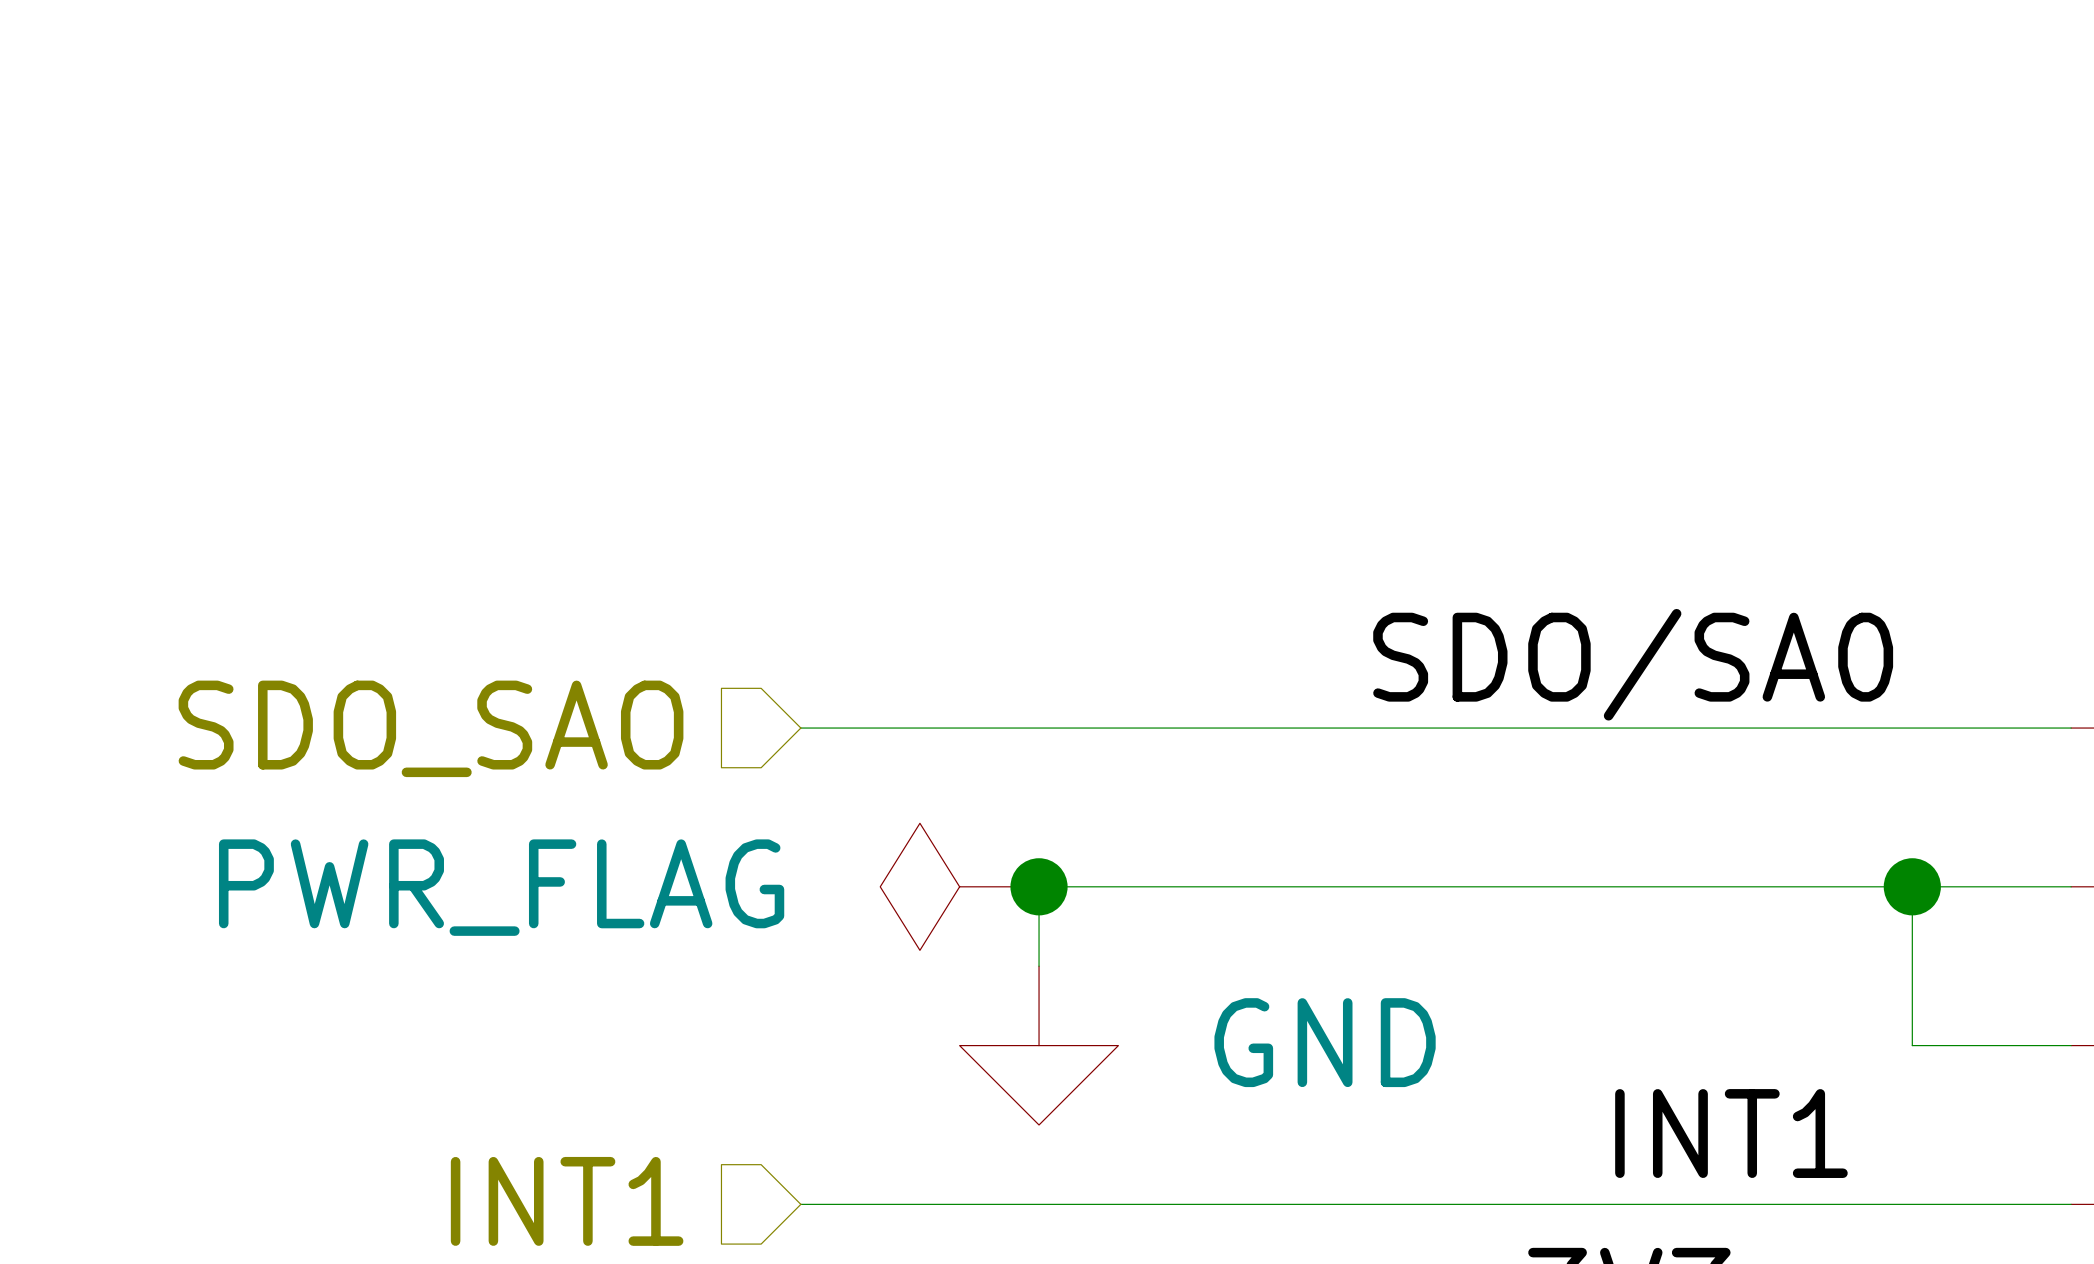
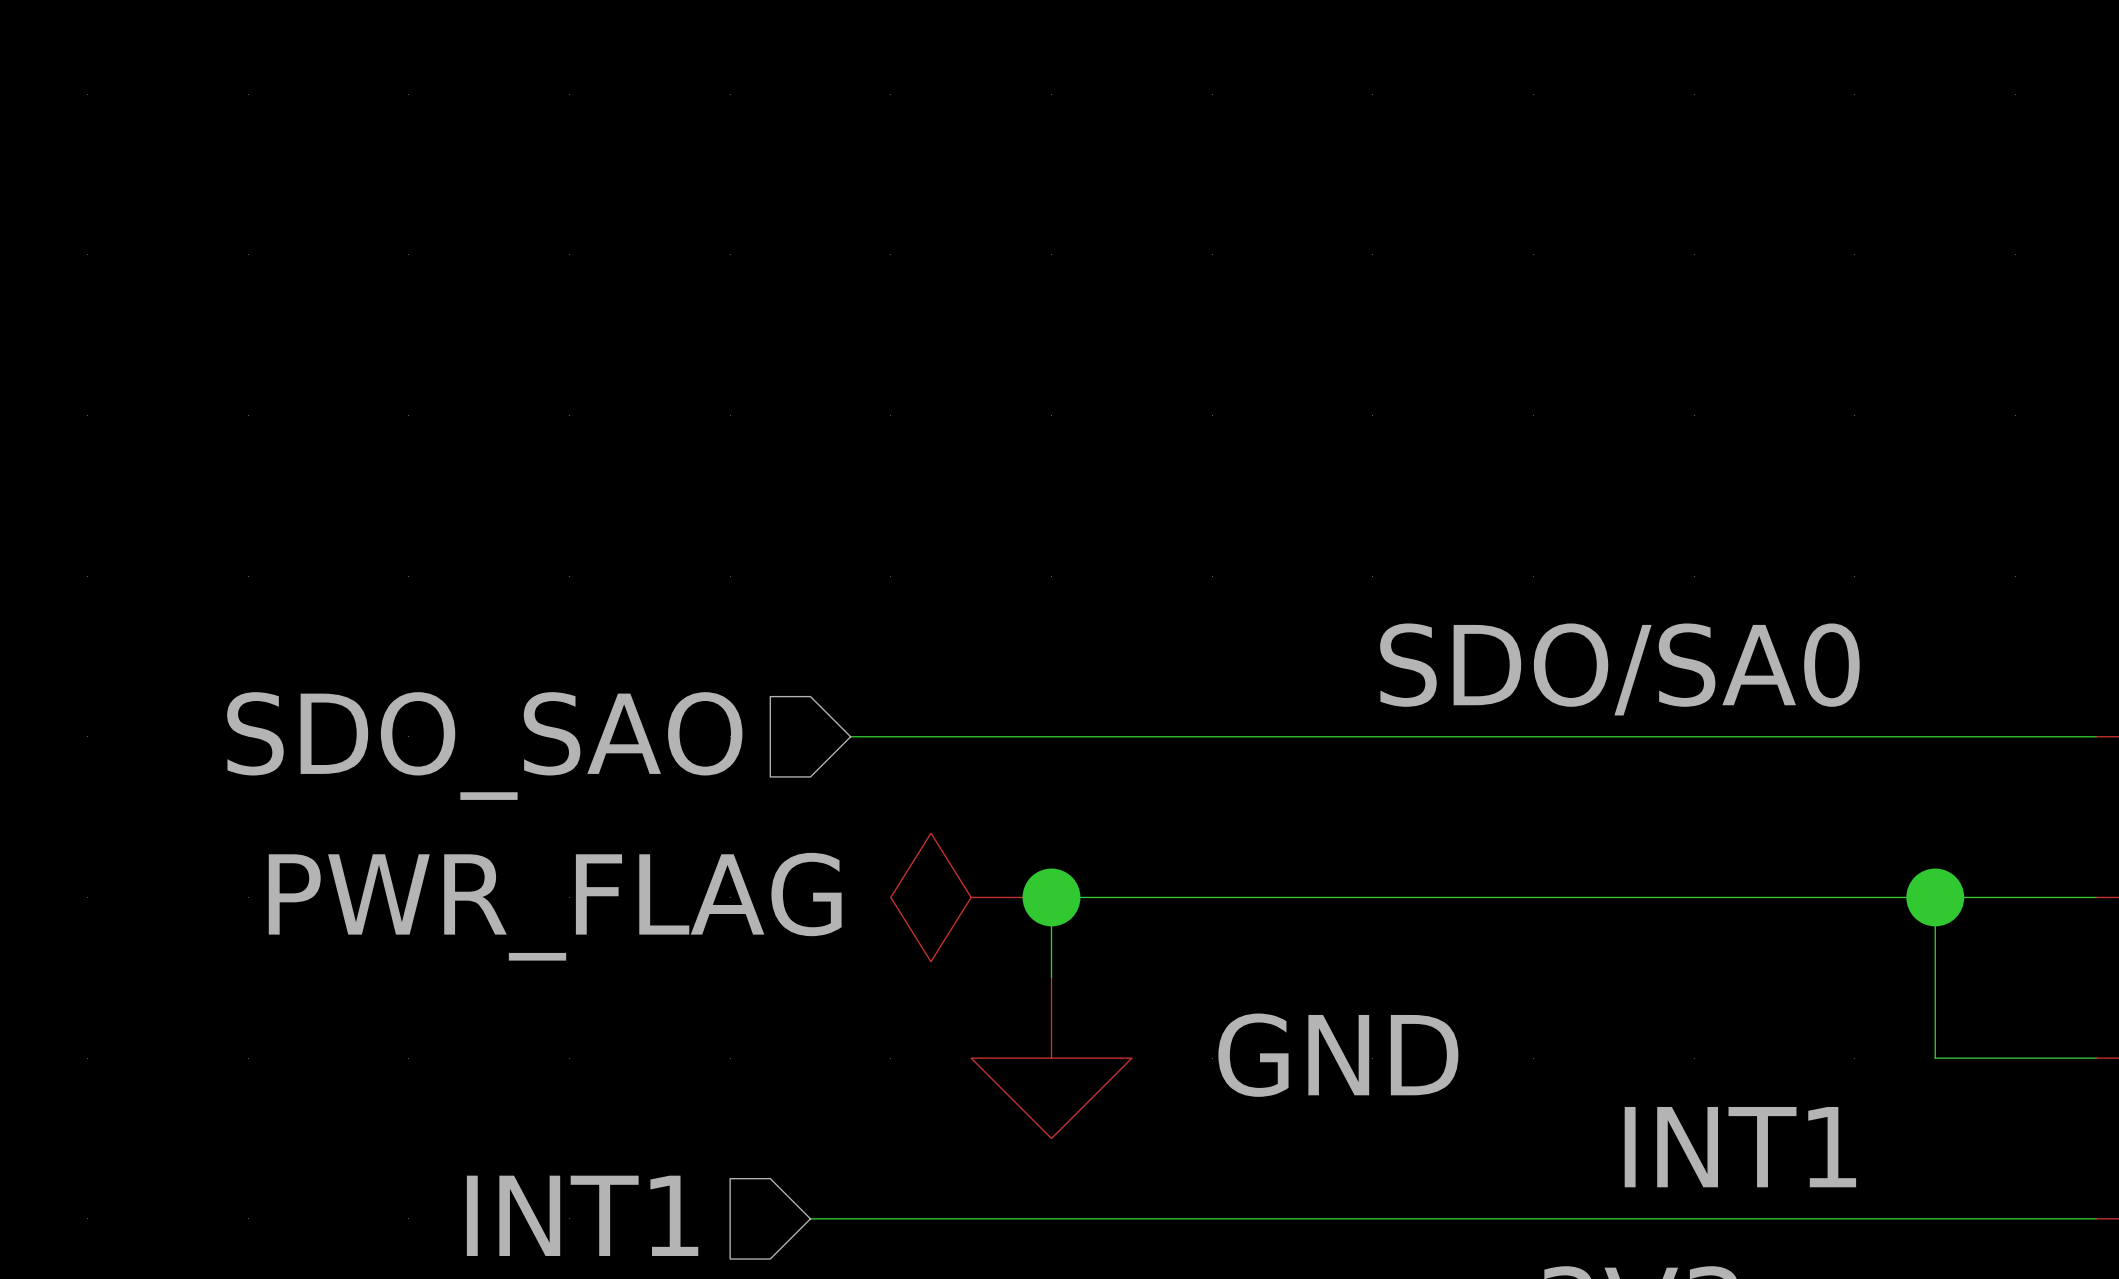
hierarchical label position: SDO_SAO (431, 728) -> SDO_SAO (484, 746)
wire: (800, 728) (840, 728) -> none
power symbol text position: PWR_FLAG (501, 887) -> PWR_FLAG (555, 906)

